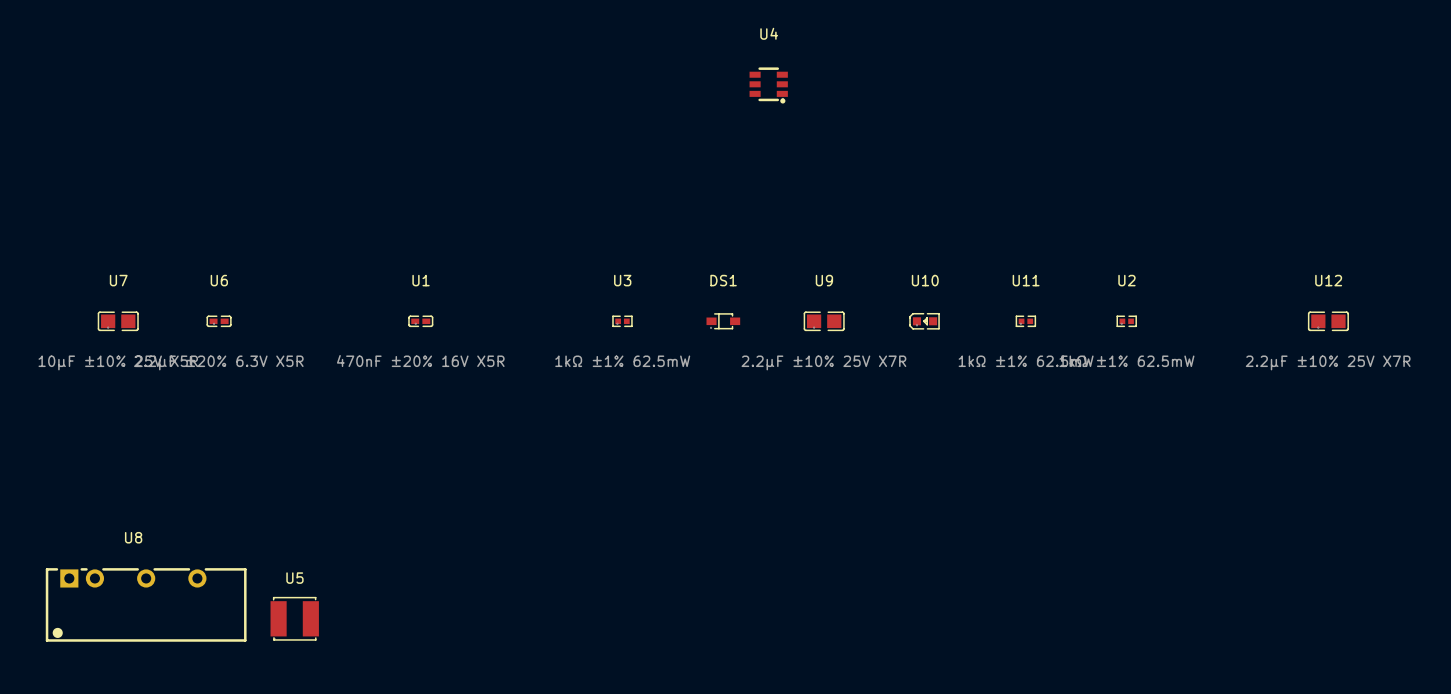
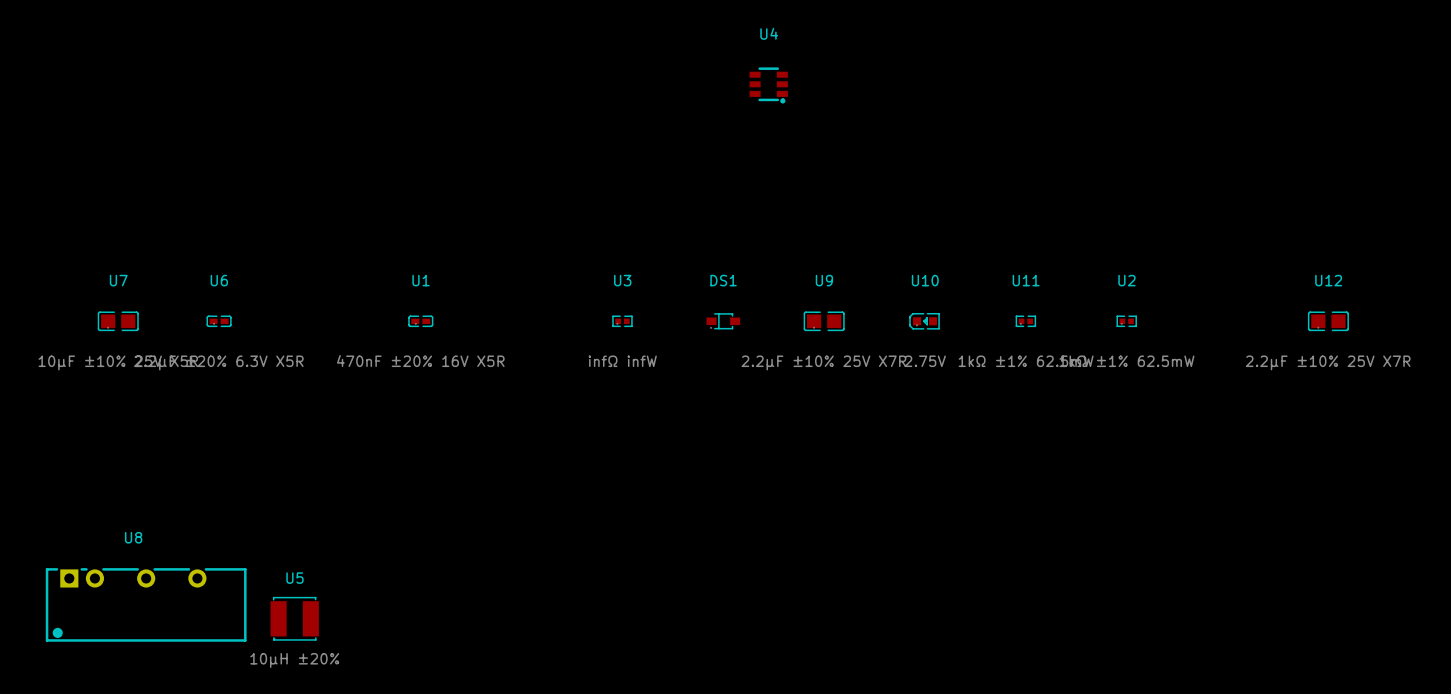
U3 value: 1kΩ ±1% 62.5mW (622, 361) -> infΩ infW (622, 361)
U10 value: none -> 2.75V (925, 361)
U5 value: none -> 10µH ±20% (294, 660)

